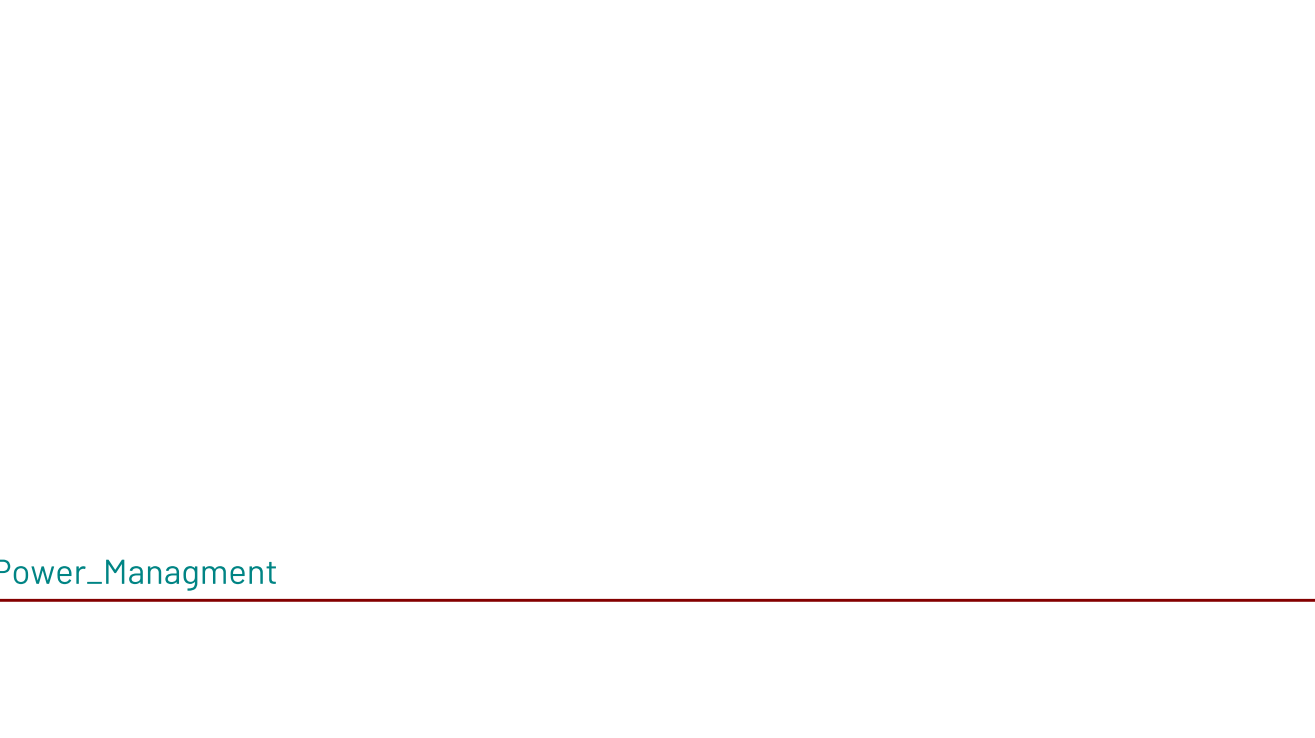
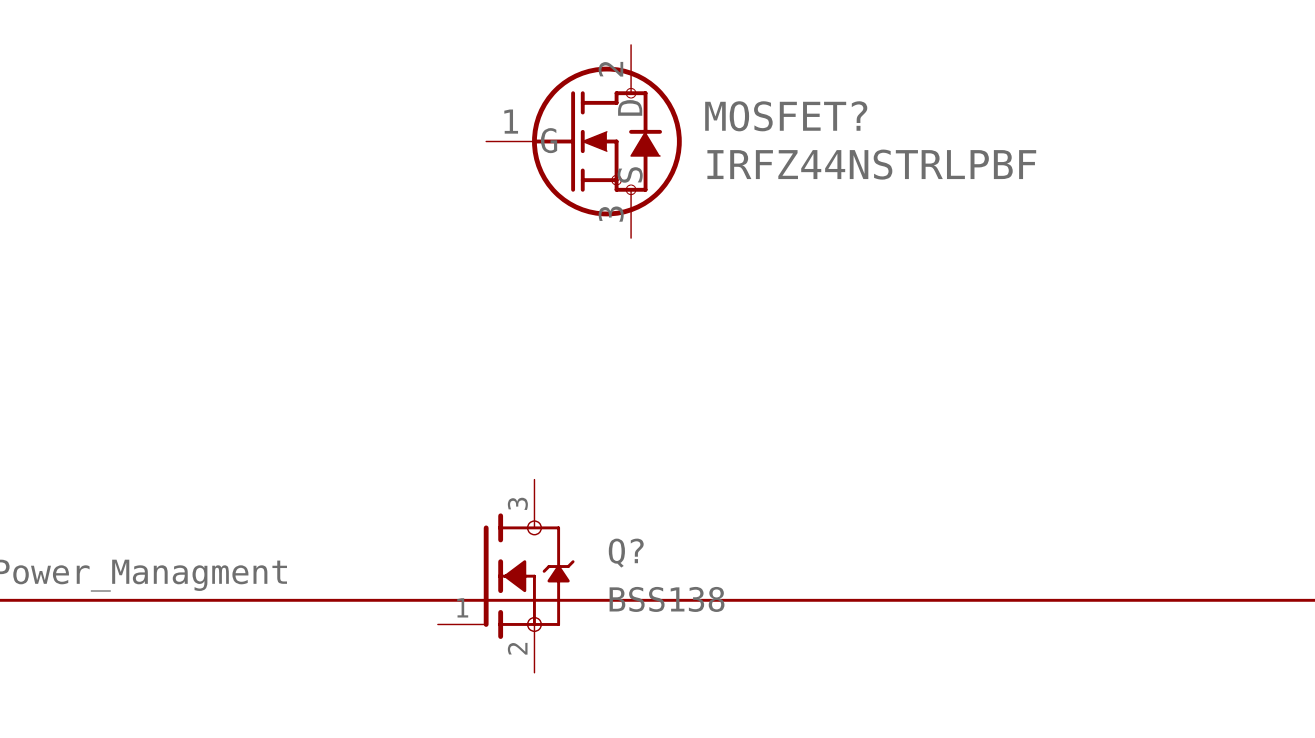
MOSFET?: none -> IRFZ44NSTRLPBF (583, 141)
Q?: none -> BSS138 (506, 576)

